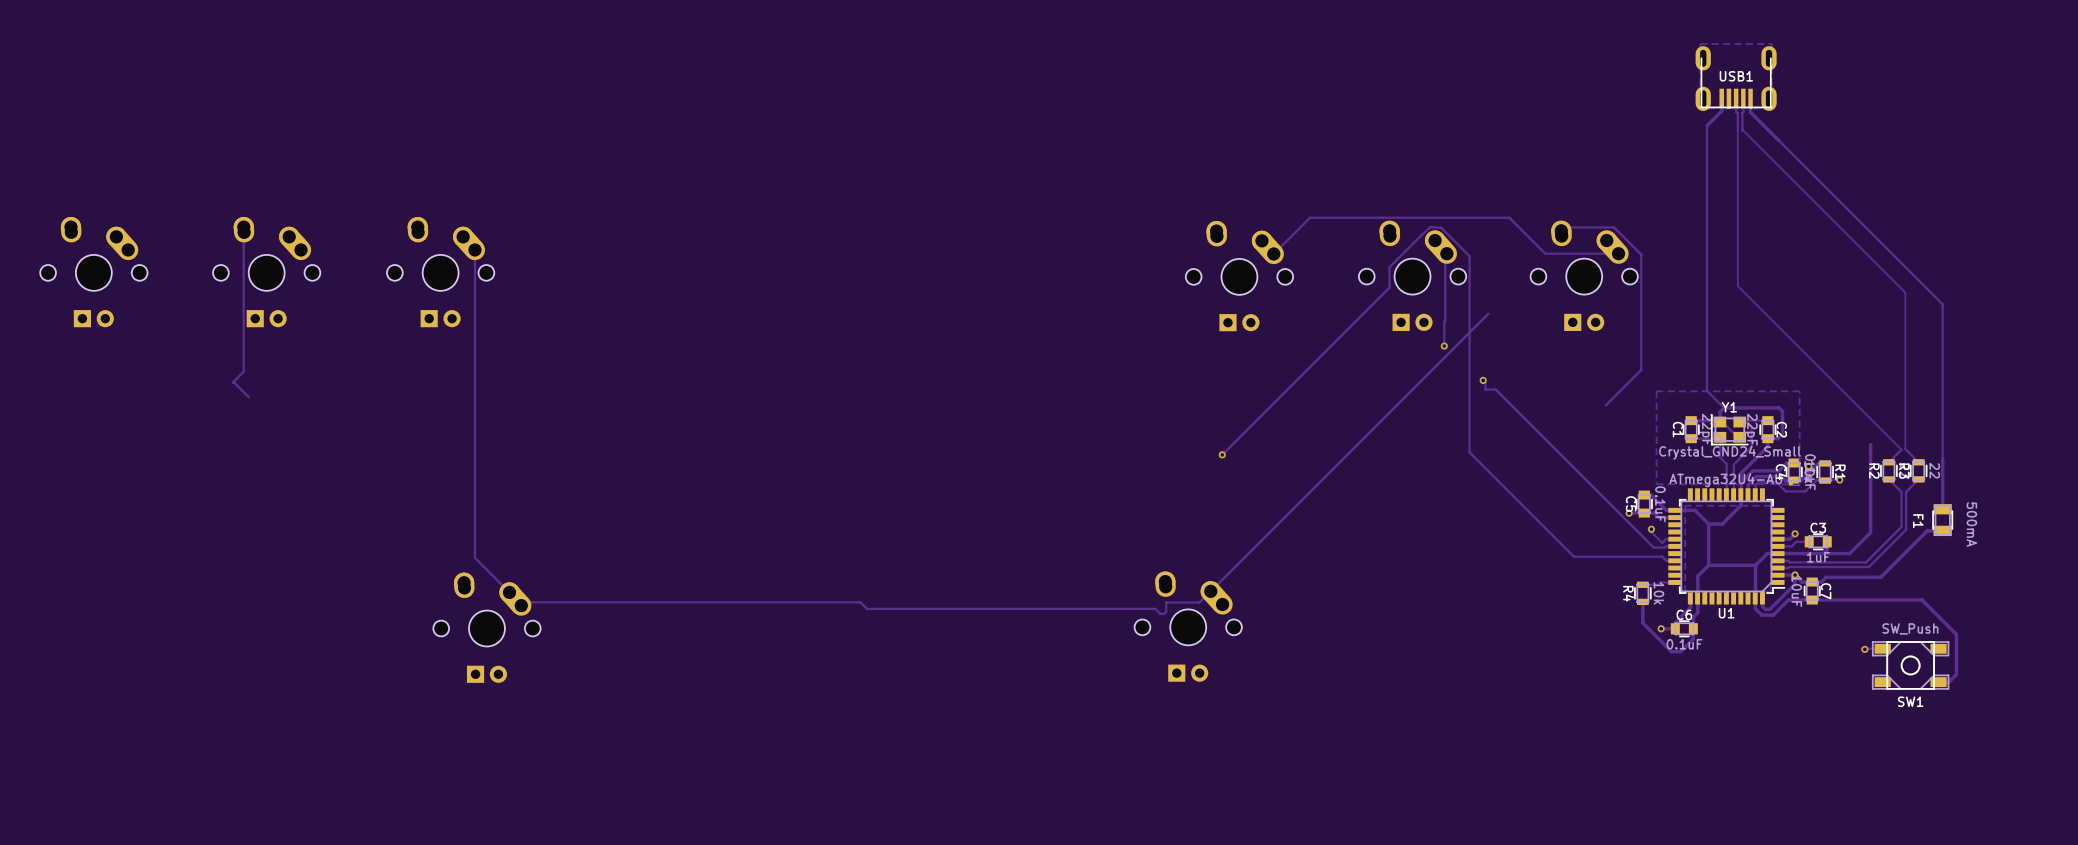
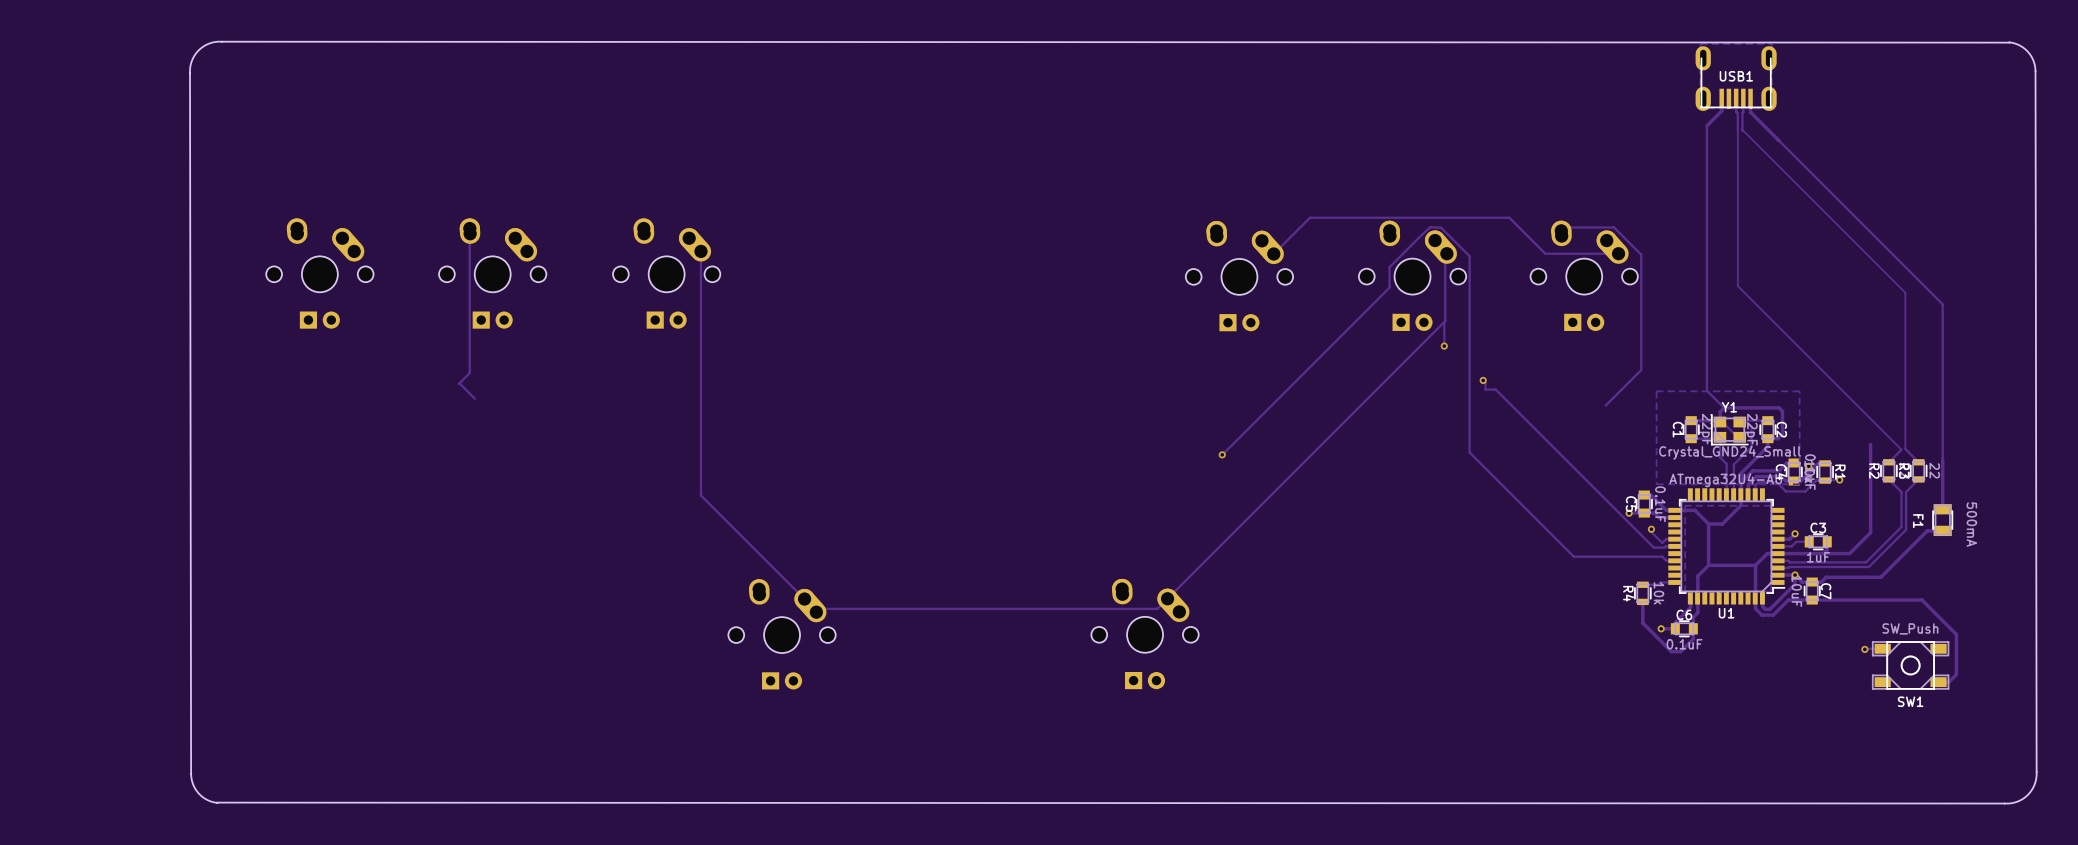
board edge: none -> (2009, 42) (2019, 45) (2027, 51) (2033, 60) (2035, 71) (2036, 775) (2032, 789) (2018, 801) (2008, 803) (216, 802)
board edge: none -> (2009, 42) (218, 41) (207, 44) (194, 55) (189, 69) (191, 774) (193, 784) (198, 793) (207, 799) (217, 802)
track: (244, 232) (243, 371) (232, 382) (248, 397) -> none
track: none -> (470, 233) (469, 373) (458, 383) (474, 398)
track: (474, 249) (474, 557) (509, 592) -> none
track: none -> (700, 251) (700, 495) (804, 599)
part: (93, 272) -> none
part position: (266, 272) -> (319, 273)
part position: (440, 272) -> (492, 273)
part: none -> (666, 273)
track: (1488, 313) (1199, 602) (1166, 602) (1166, 611) (1163, 613) (1160, 613) (1155, 608) -> (1444, 322) (1155, 608)
track: (524, 602) (860, 602) (866, 608) -> (816, 612) (819, 608) (866, 608)
part position: (1188, 626) -> (1145, 634)
part: (486, 627) -> none
part: none -> (782, 634)

